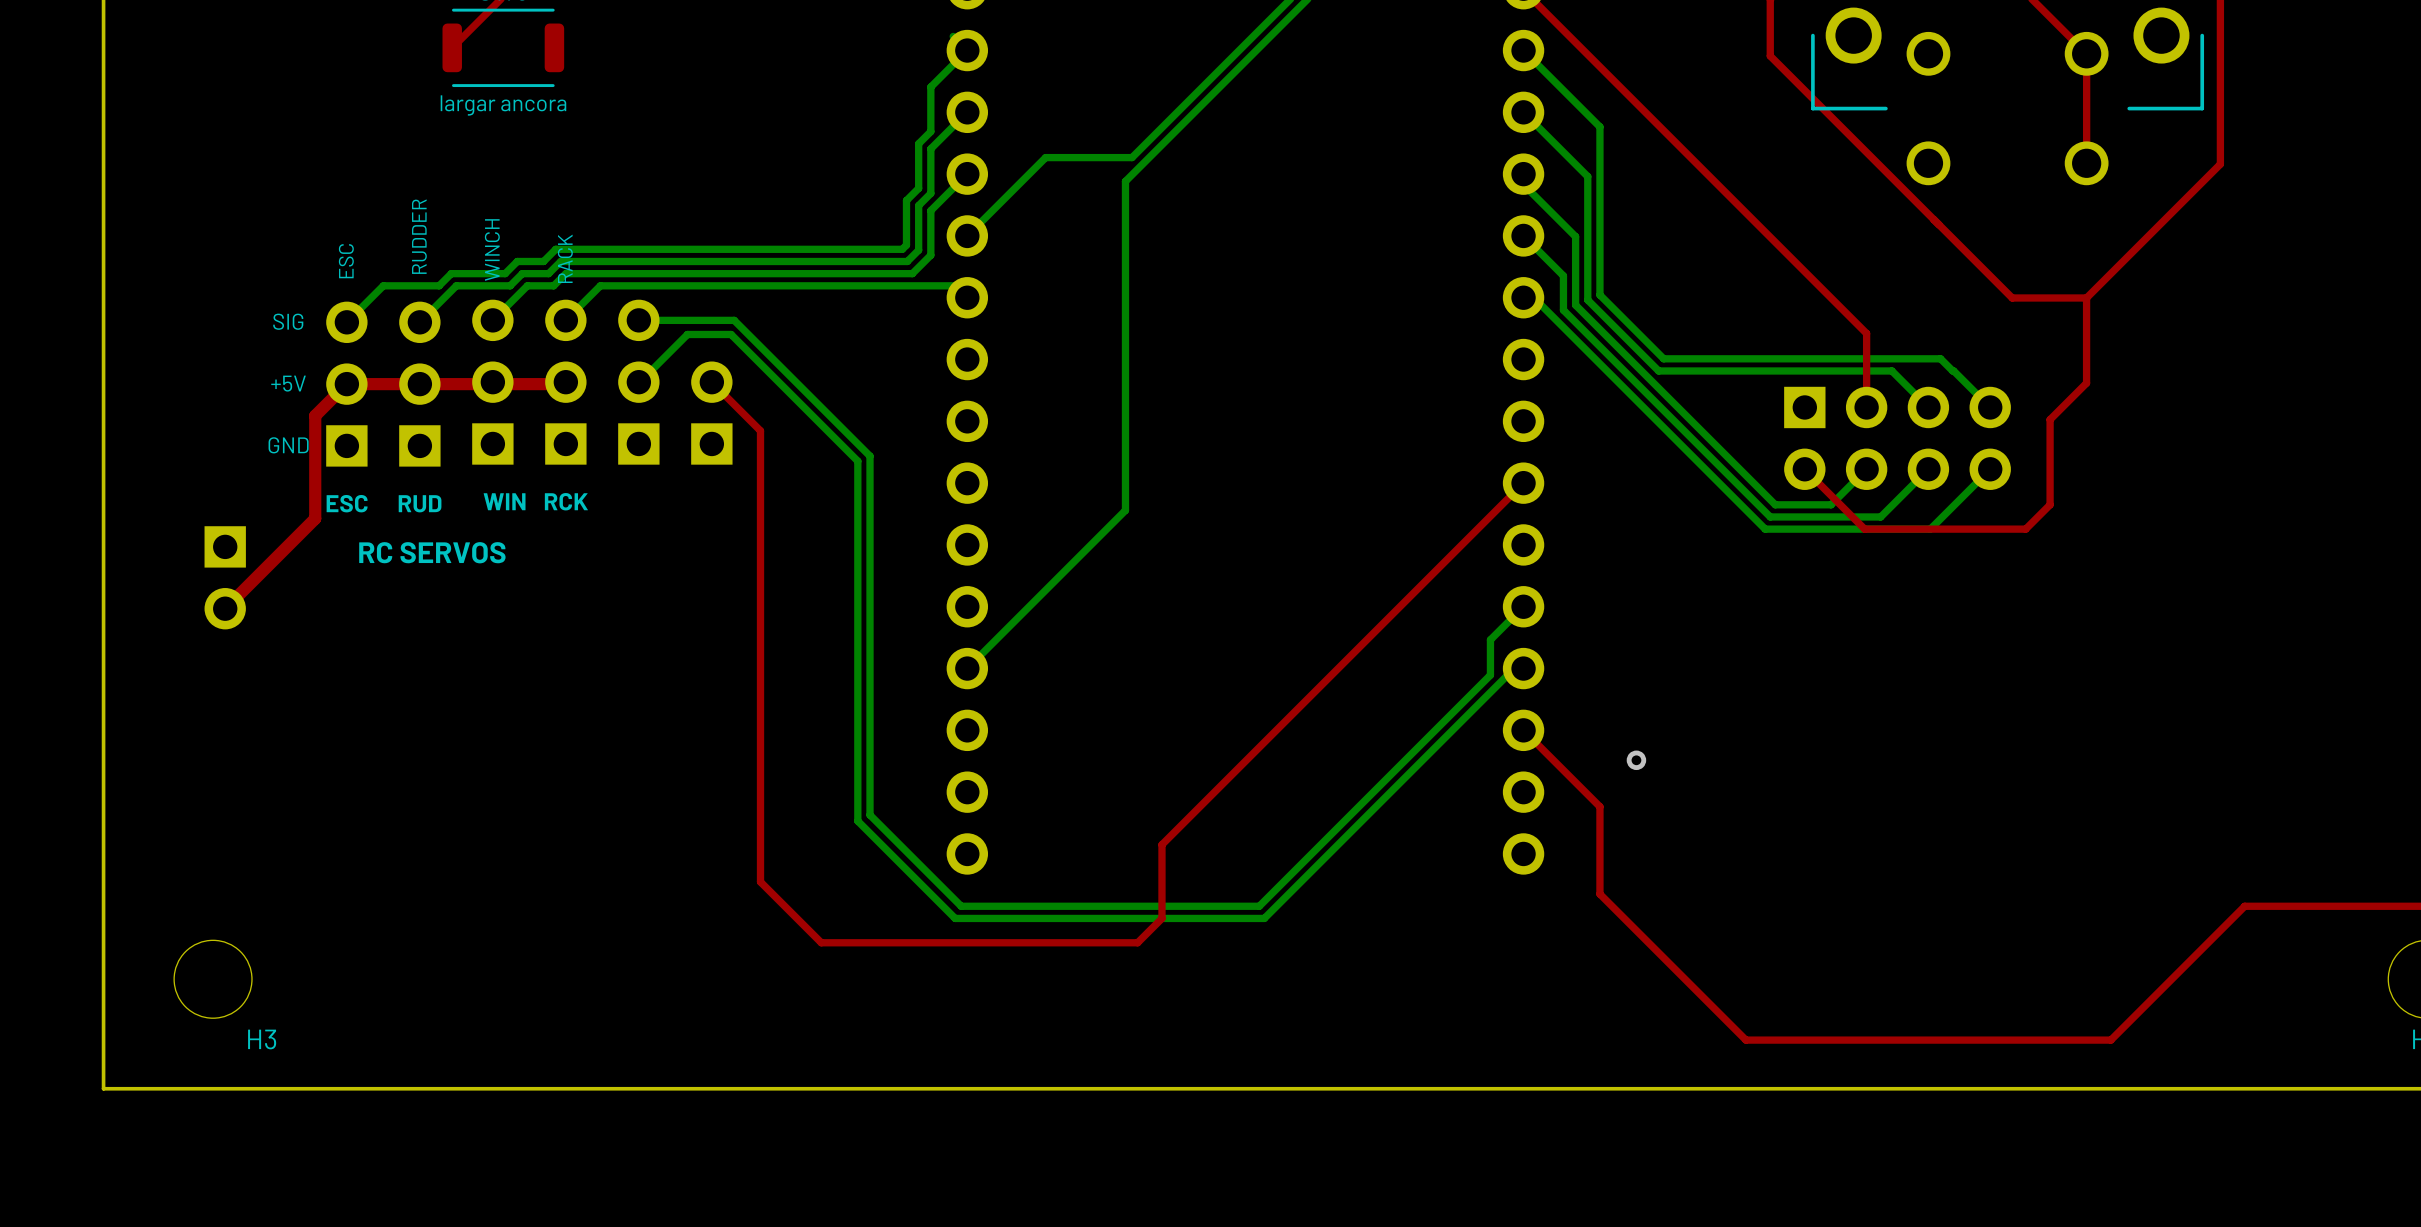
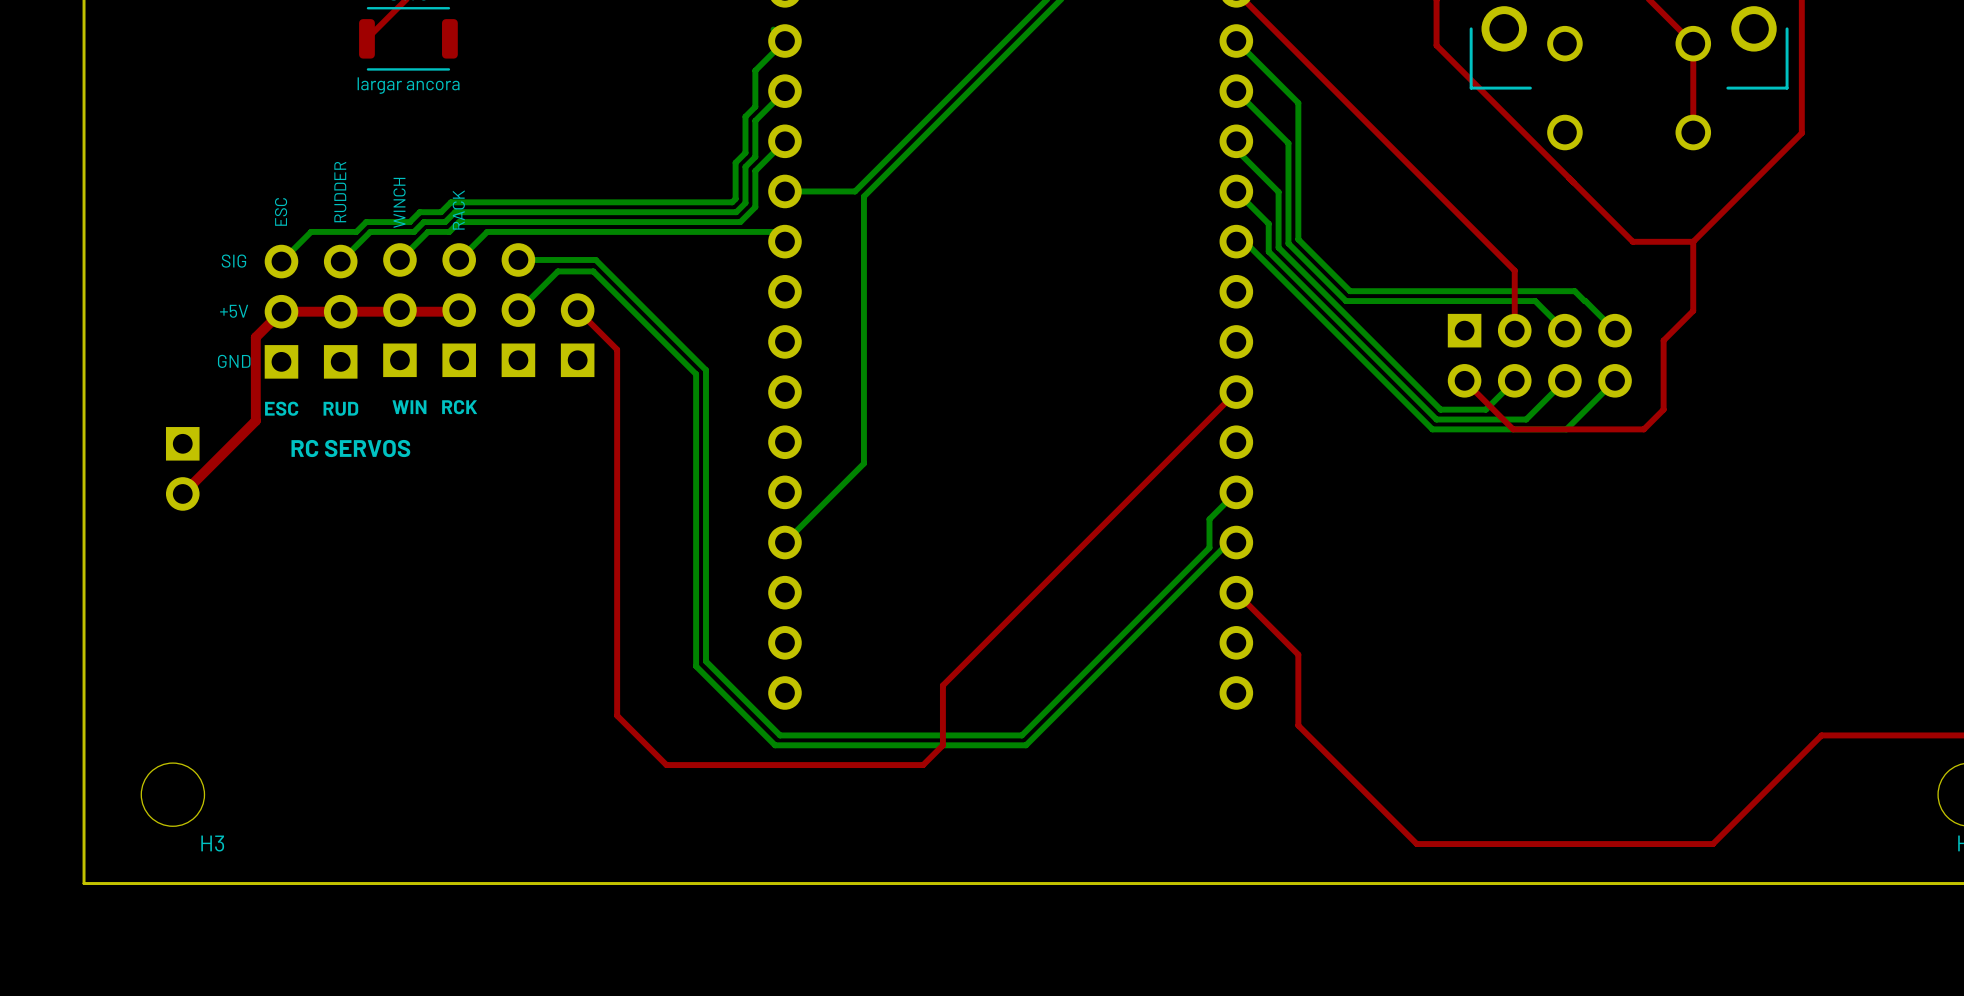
bottom track: (1132, 157) (1045, 157) (967, 235) -> (918, 127) (855, 191) (784, 191)
bottom track: (1125, 181) (1125, 510) (1064, 571) -> (913, 147) (863, 196) (863, 463)
via: (1636, 760) -> none

